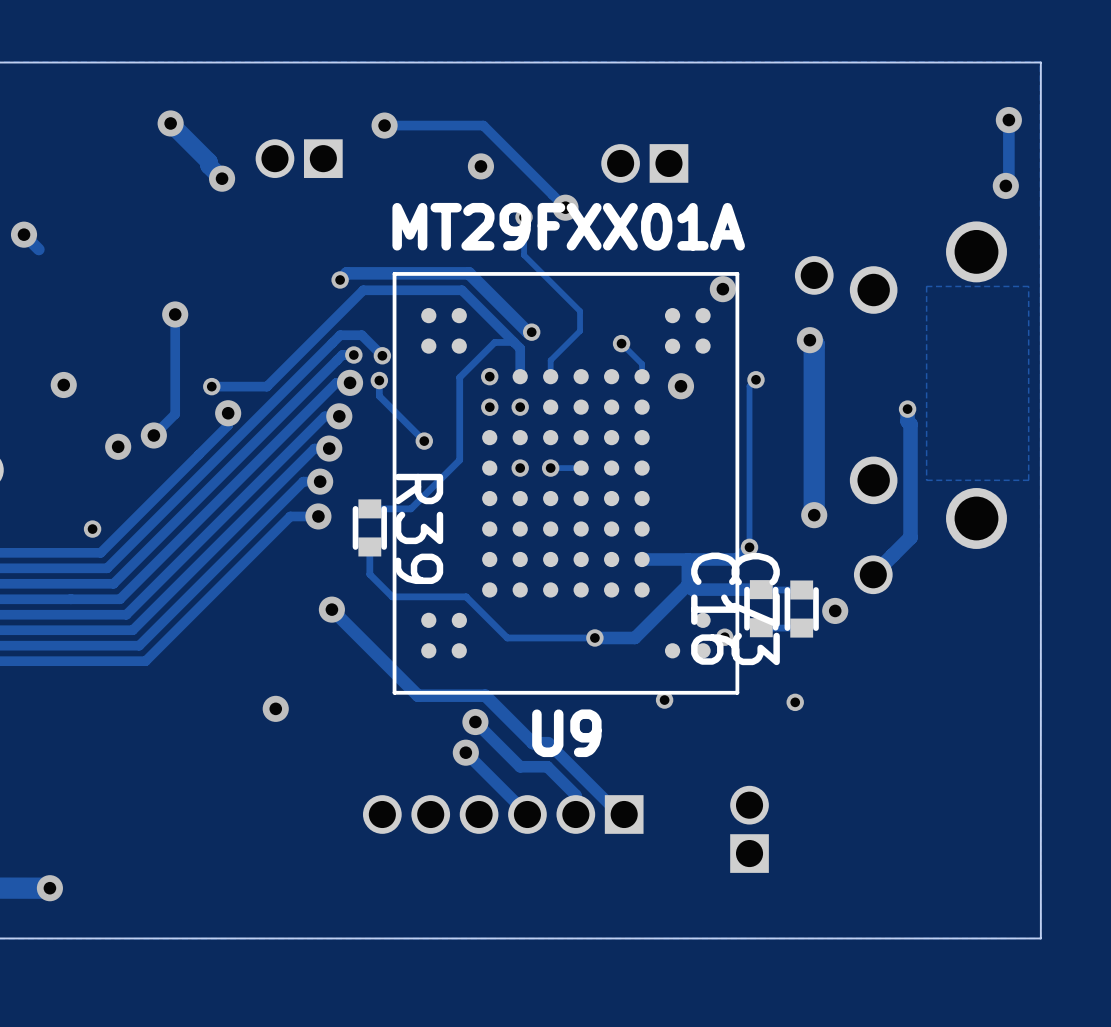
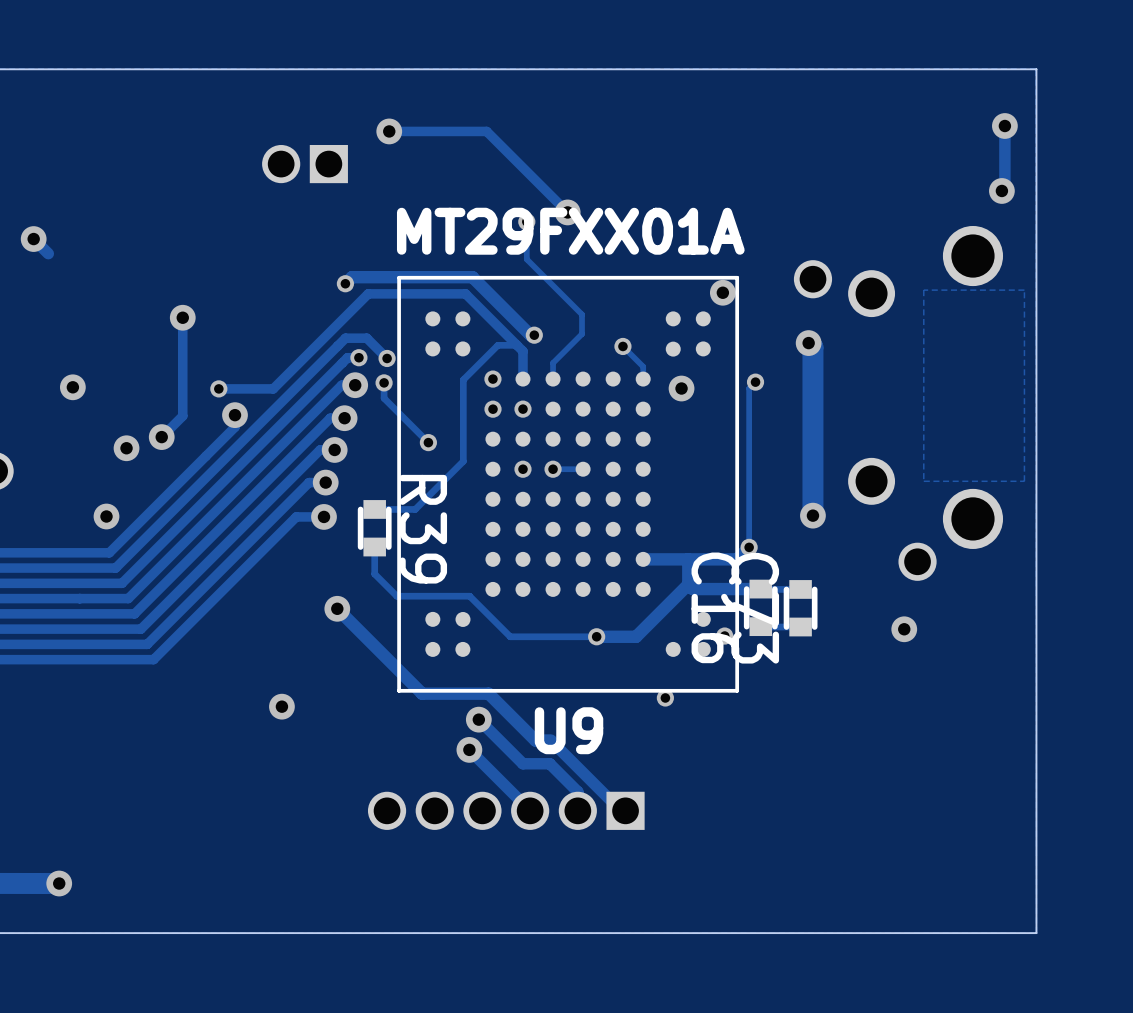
track: (170, 123) (209, 161) (209, 165) (222, 178) -> none
via: (170, 123) -> none
part: (644, 163) -> none
via: (480, 166) -> none
via: (222, 178) -> none
track: (907, 409) (907, 421) (910, 424) (910, 537) (873, 574) -> none
via: (907, 409) -> none
via size: [83, 520, 102, 538] -> [93, 503, 120, 530]
part position: (873, 574) -> (917, 561)
via position: (835, 610) -> (904, 629)
via: (795, 702) -> none
part: (749, 829) -> none

